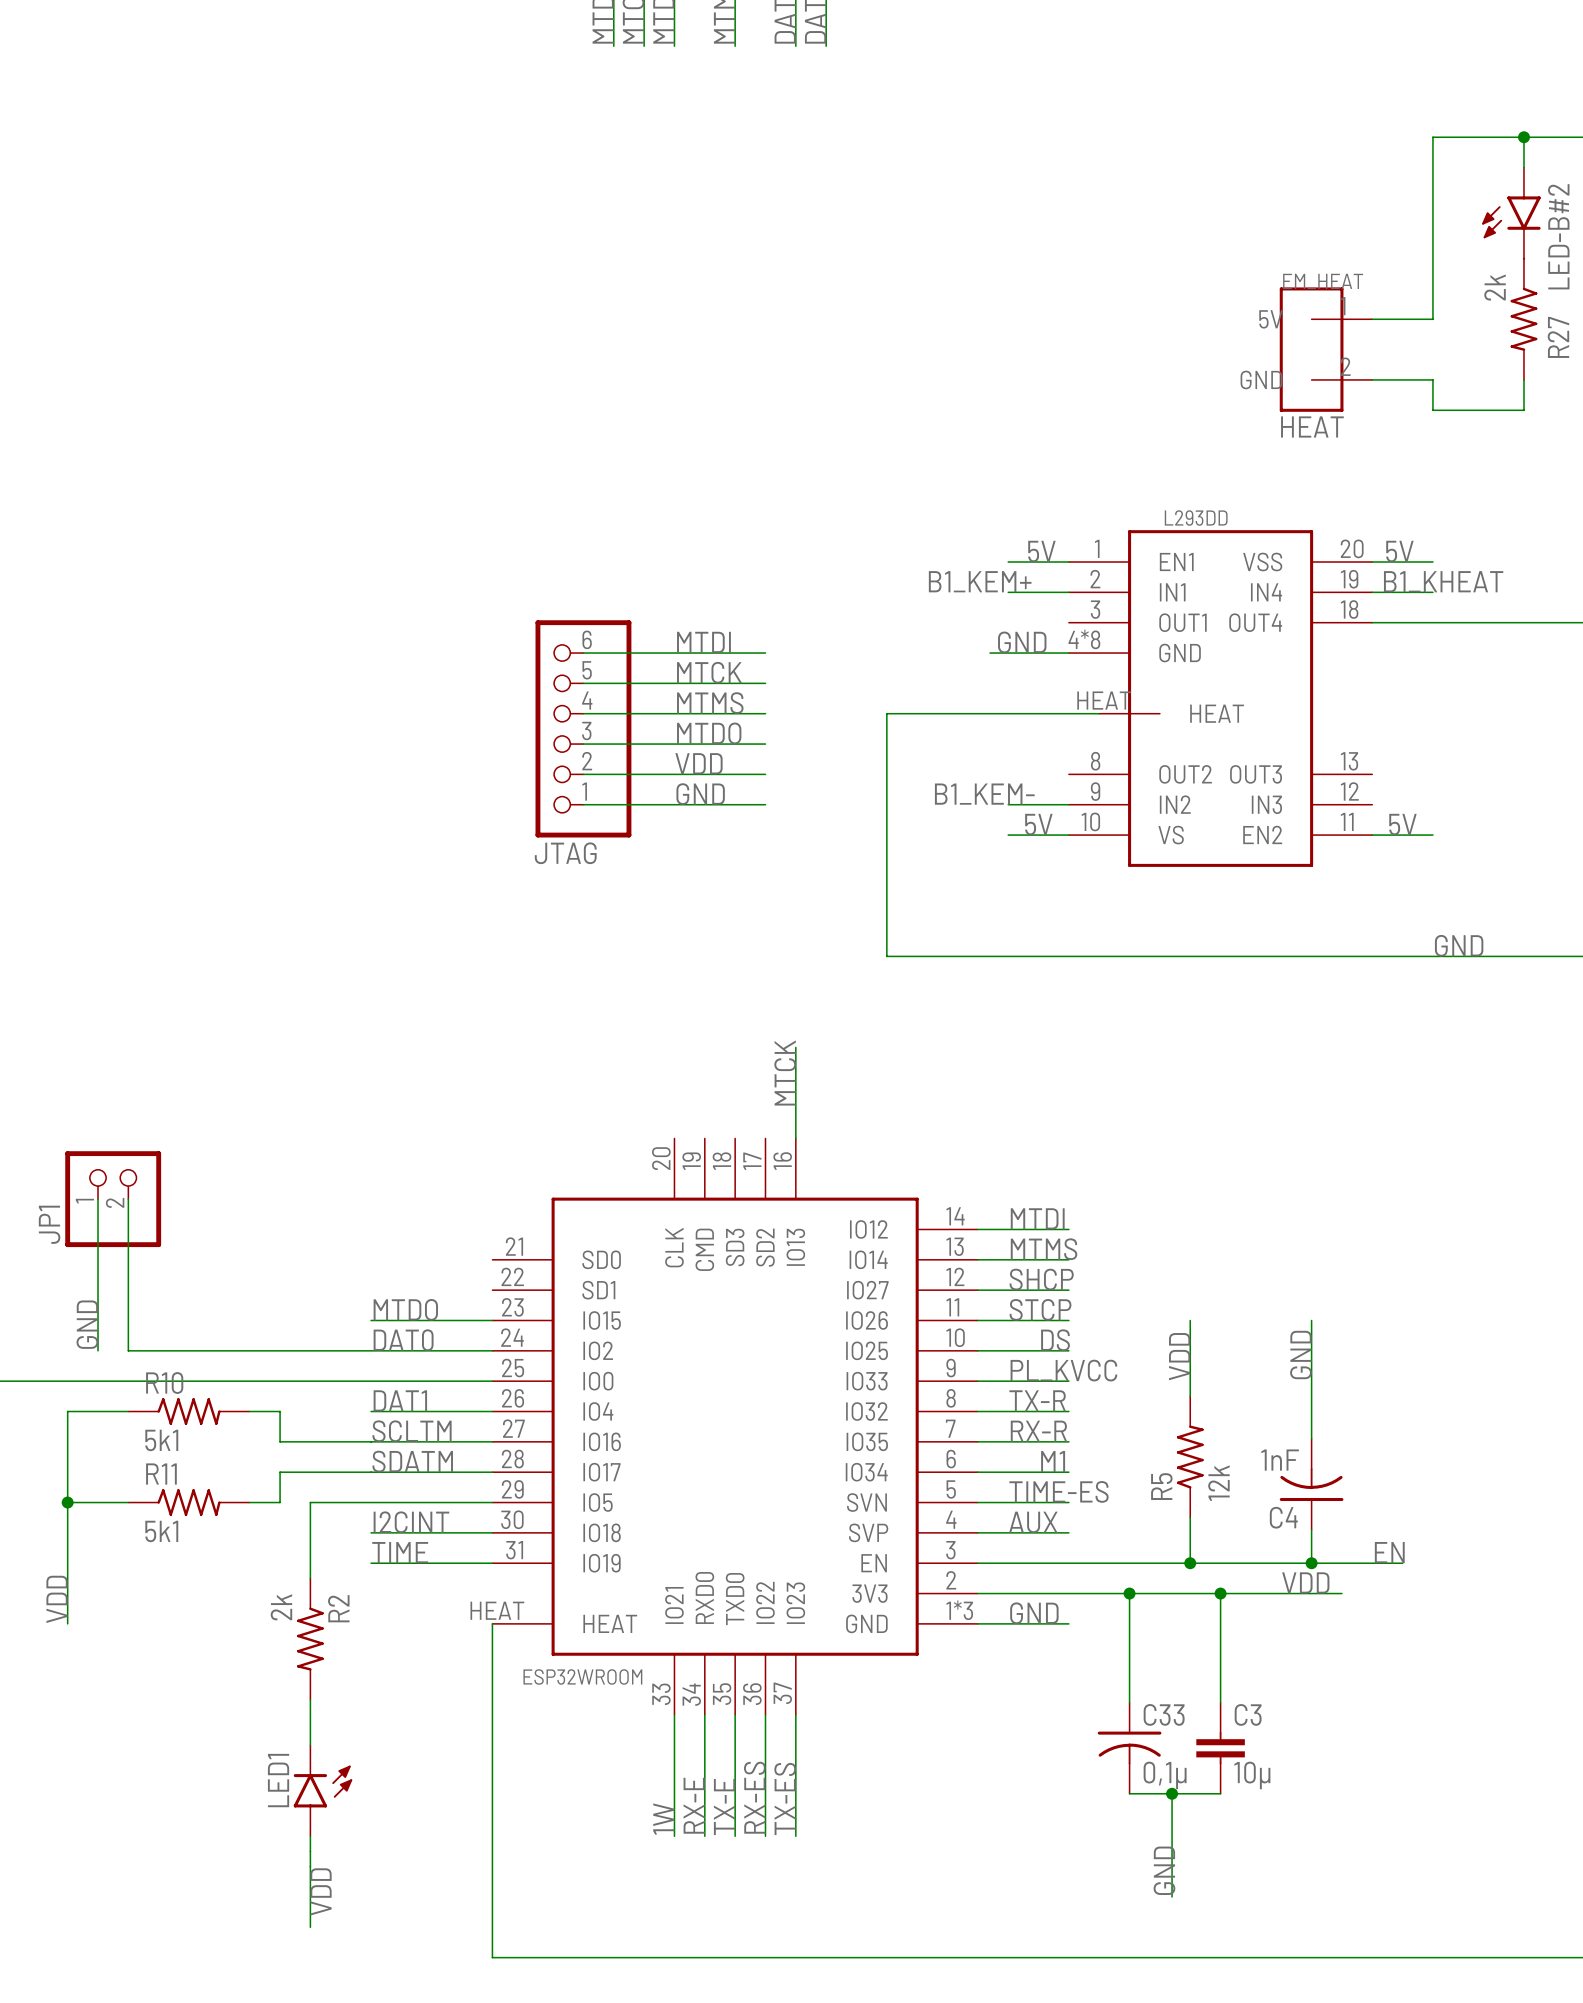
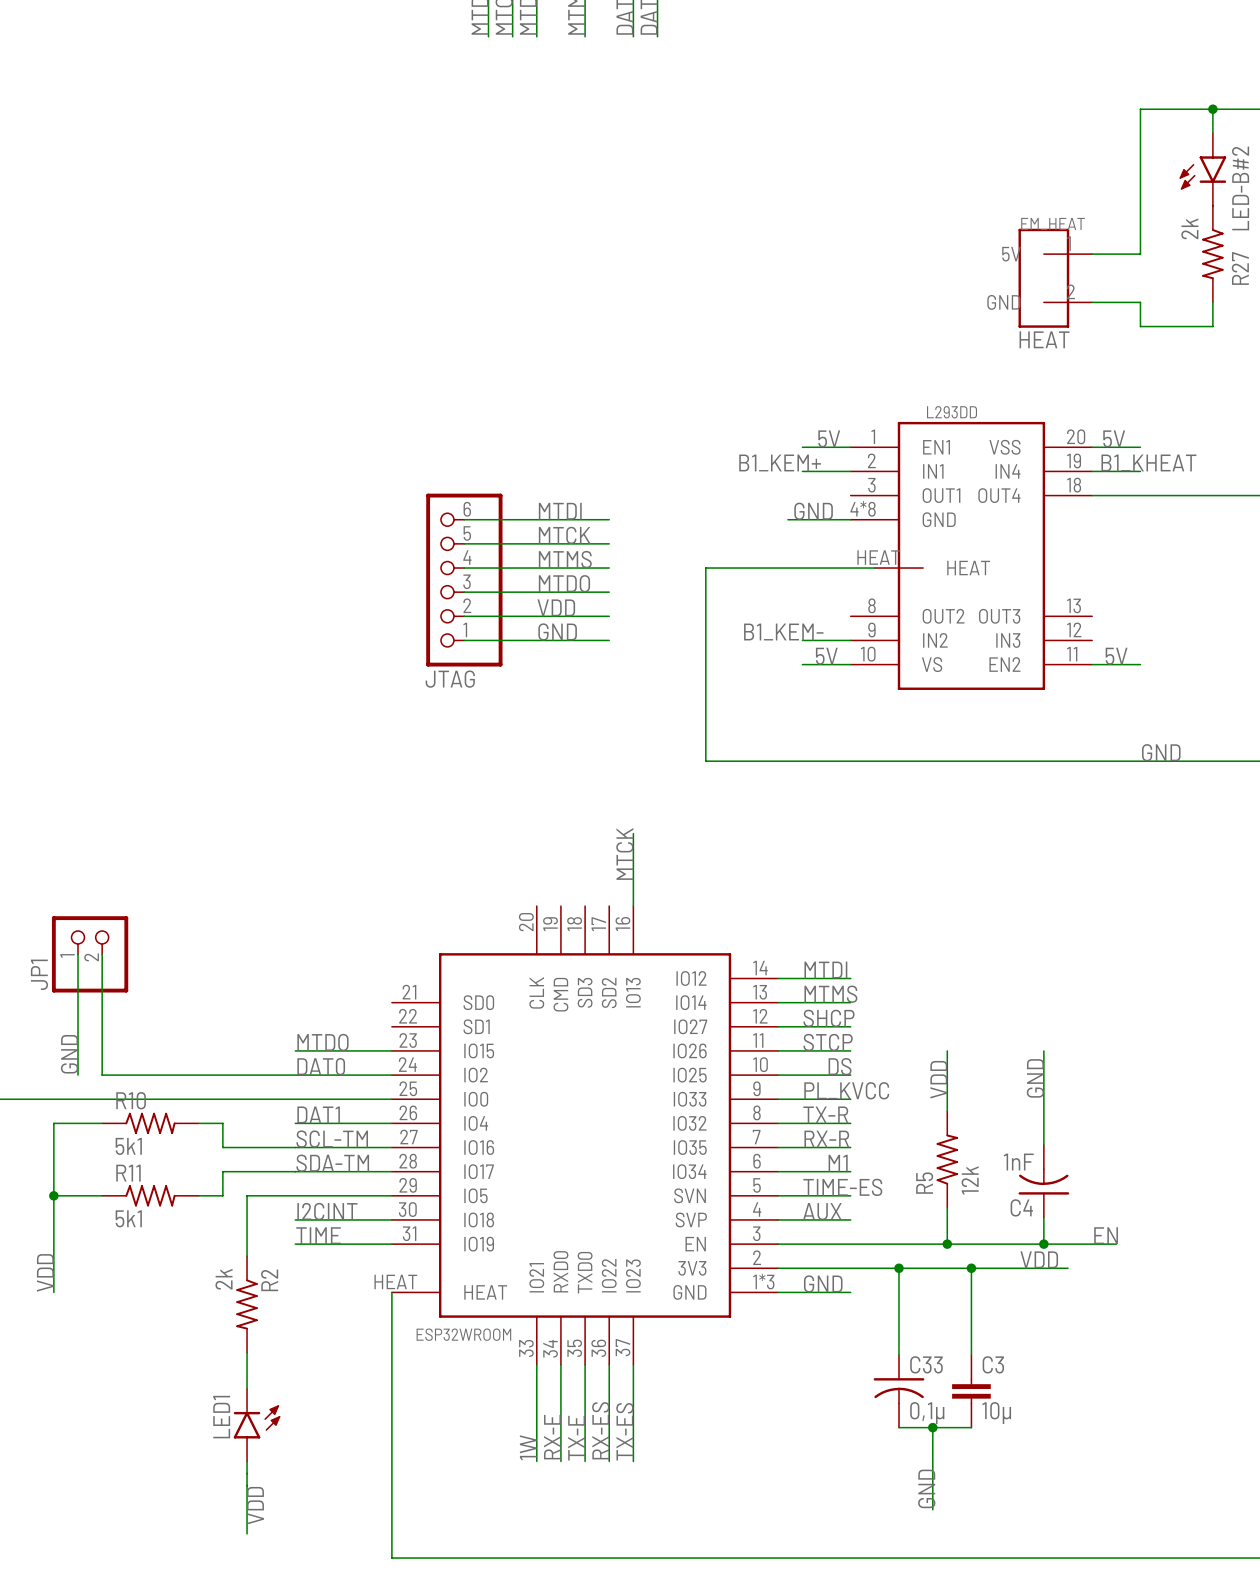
label: SCLTM (412, 1431) -> SCL-TM (332, 1139)
label: SDATM (412, 1461) -> SDA-TM (332, 1163)

